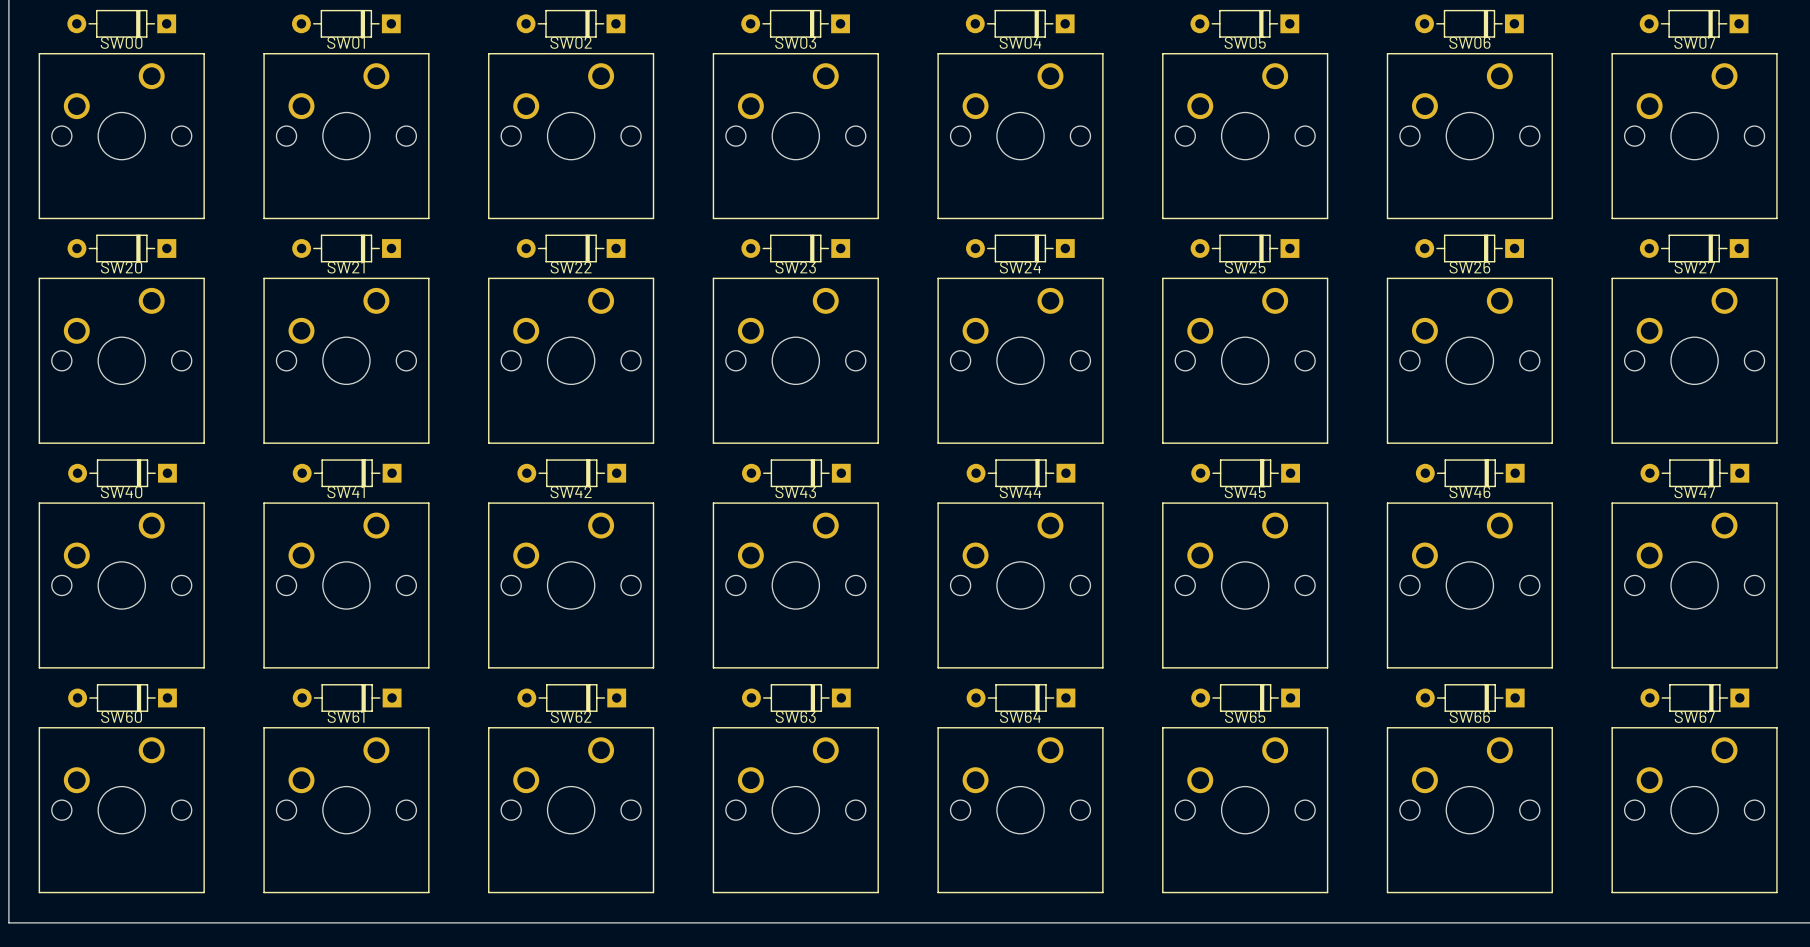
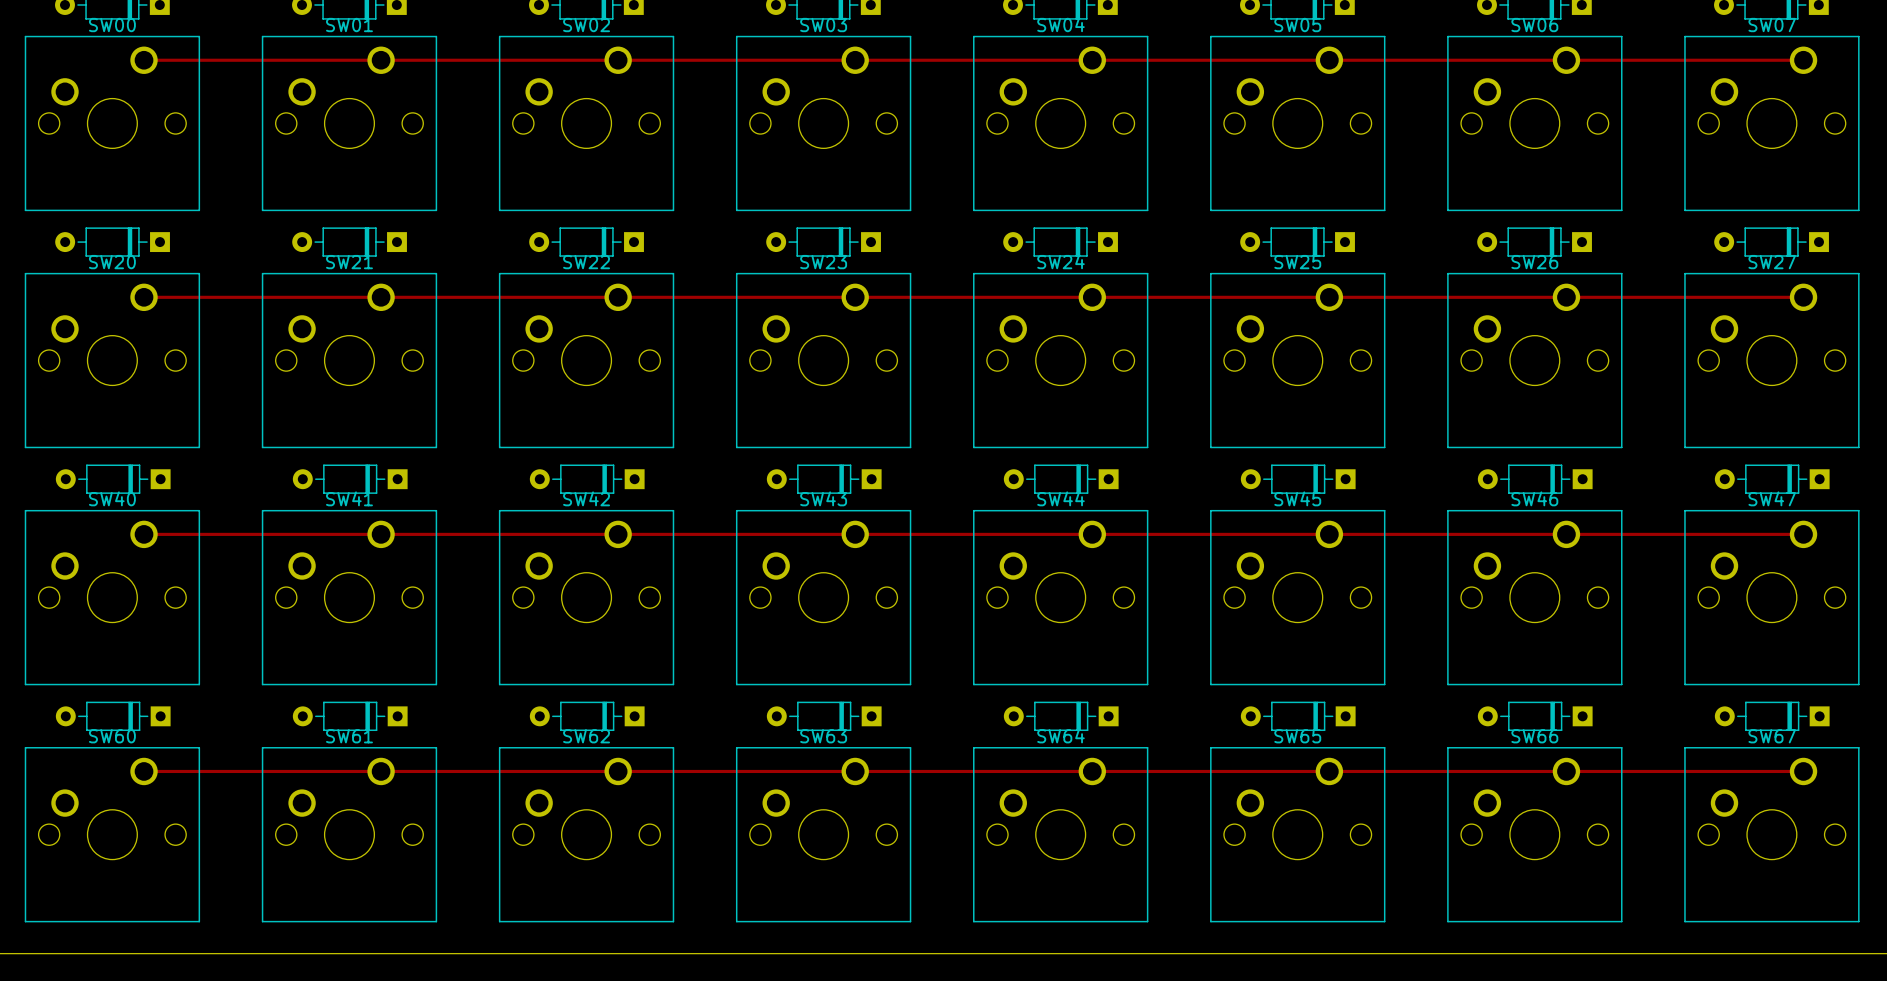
track: none -> (144, 60) (1803, 60)
track: none -> (144, 297) (1803, 297)
track: none -> (144, 534) (1803, 534)
track: none -> (144, 771) (1803, 771)

